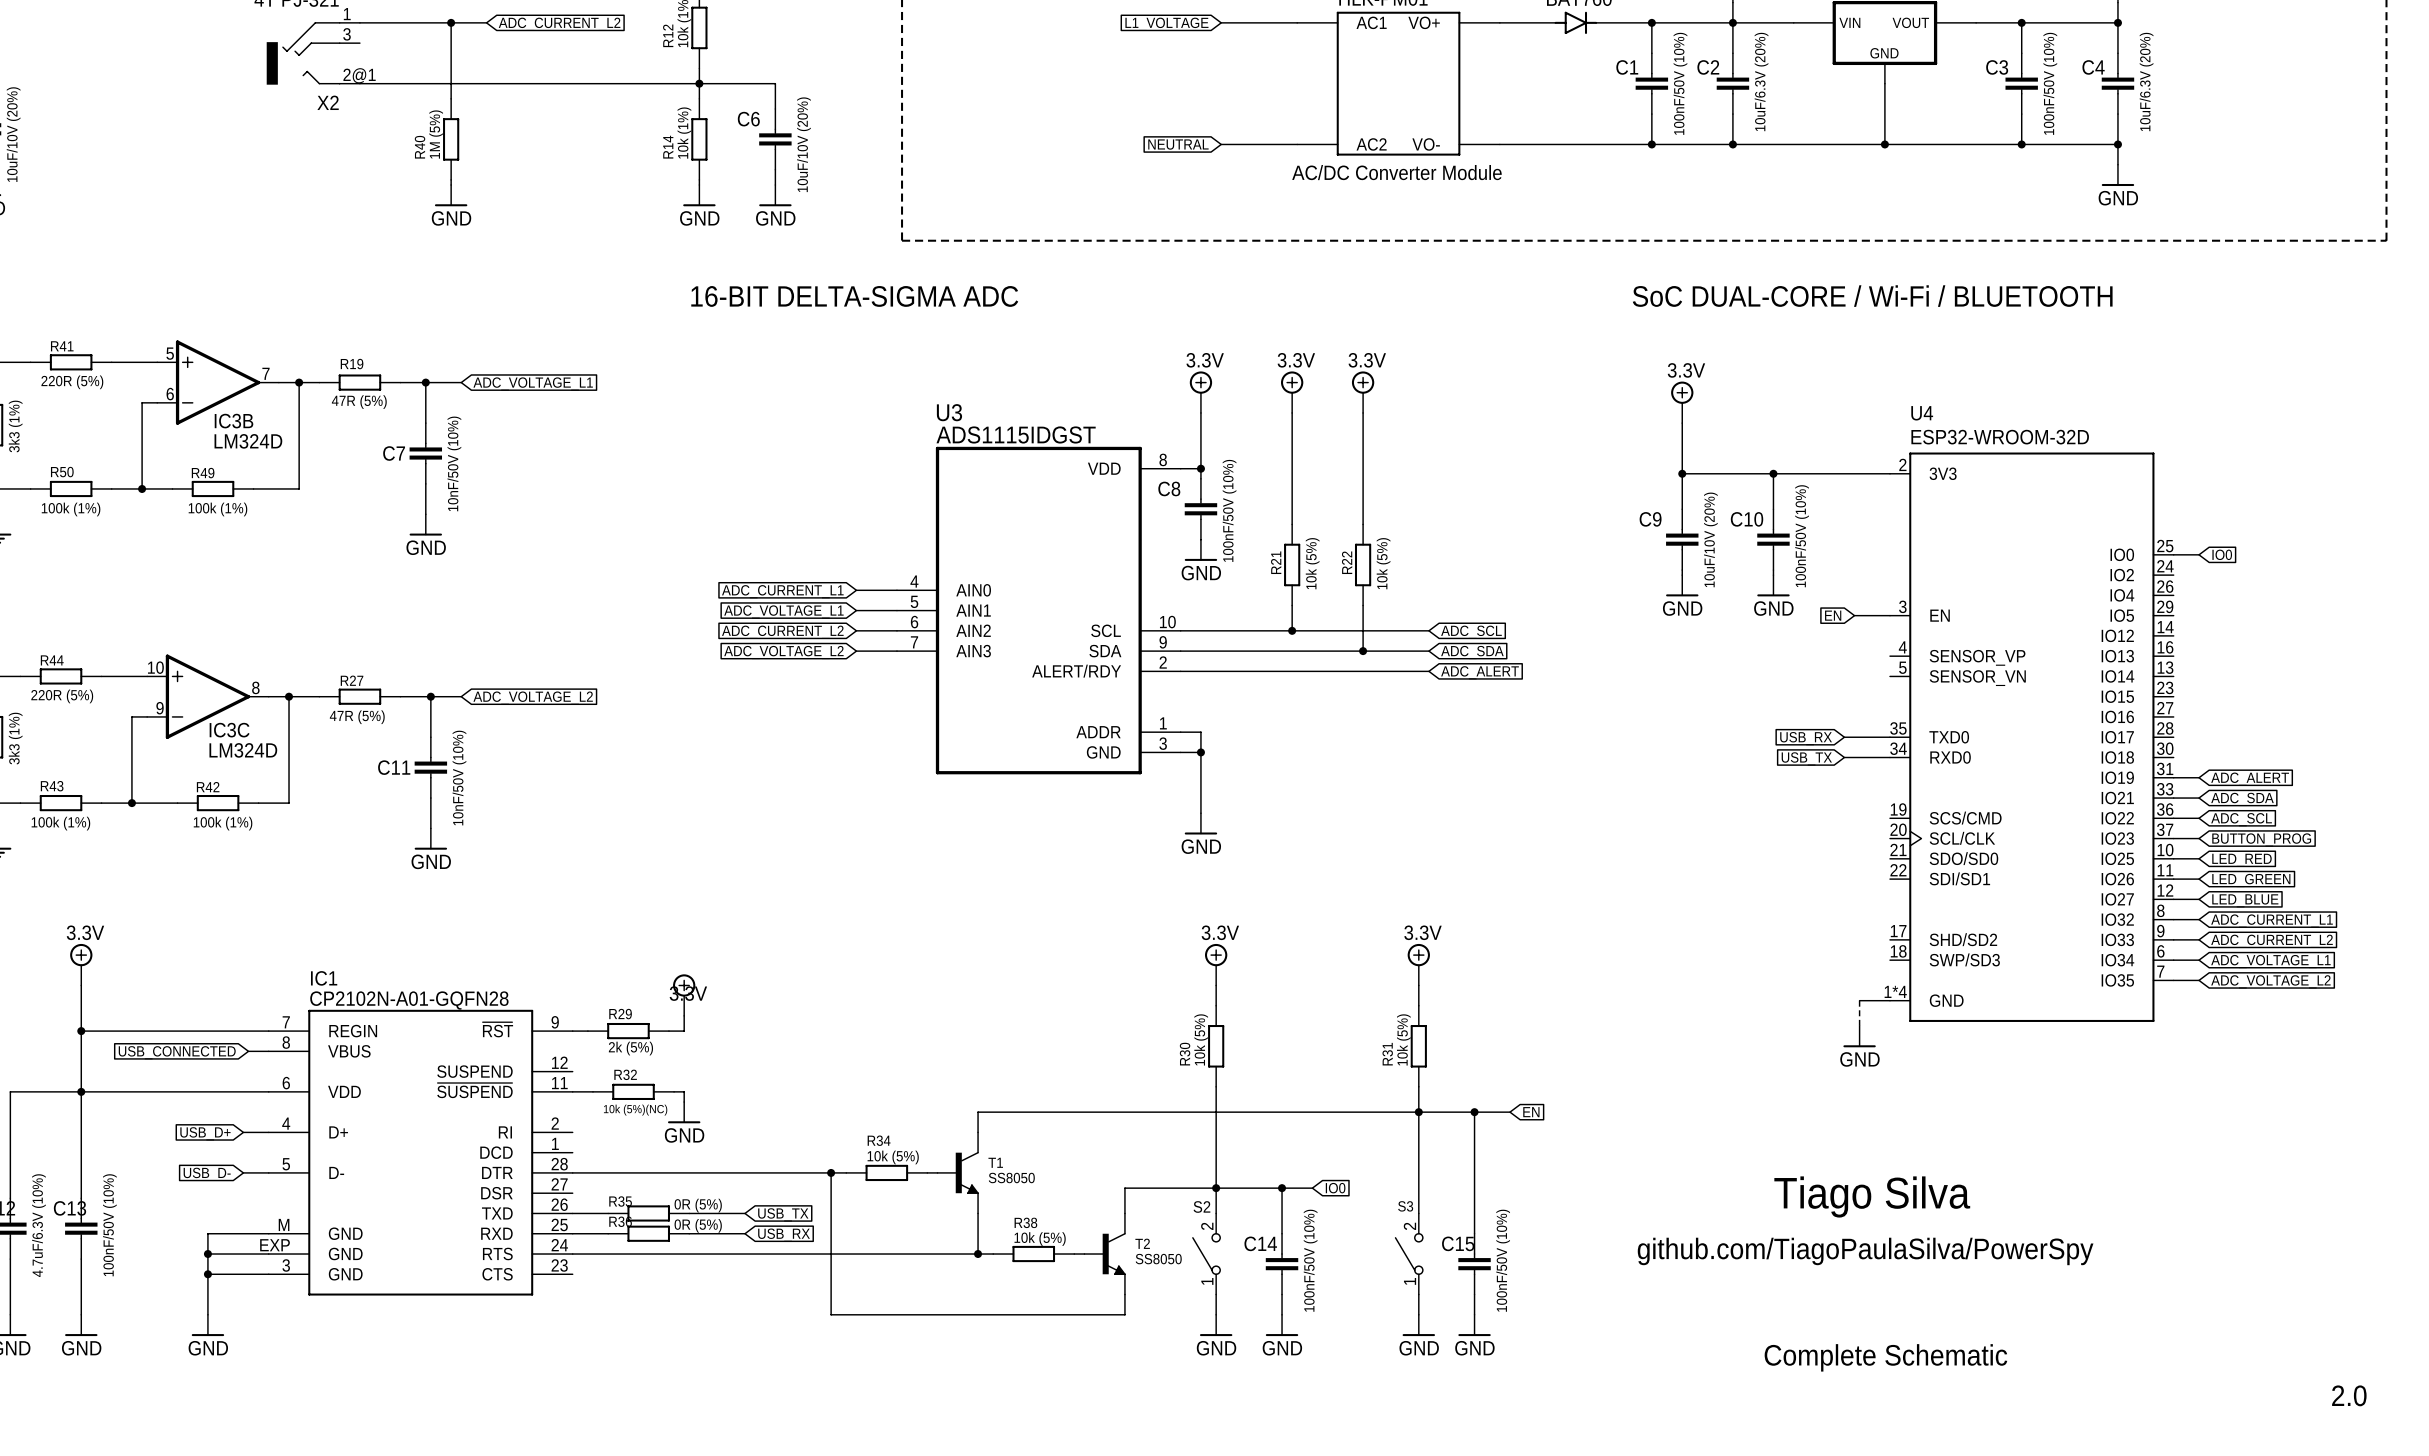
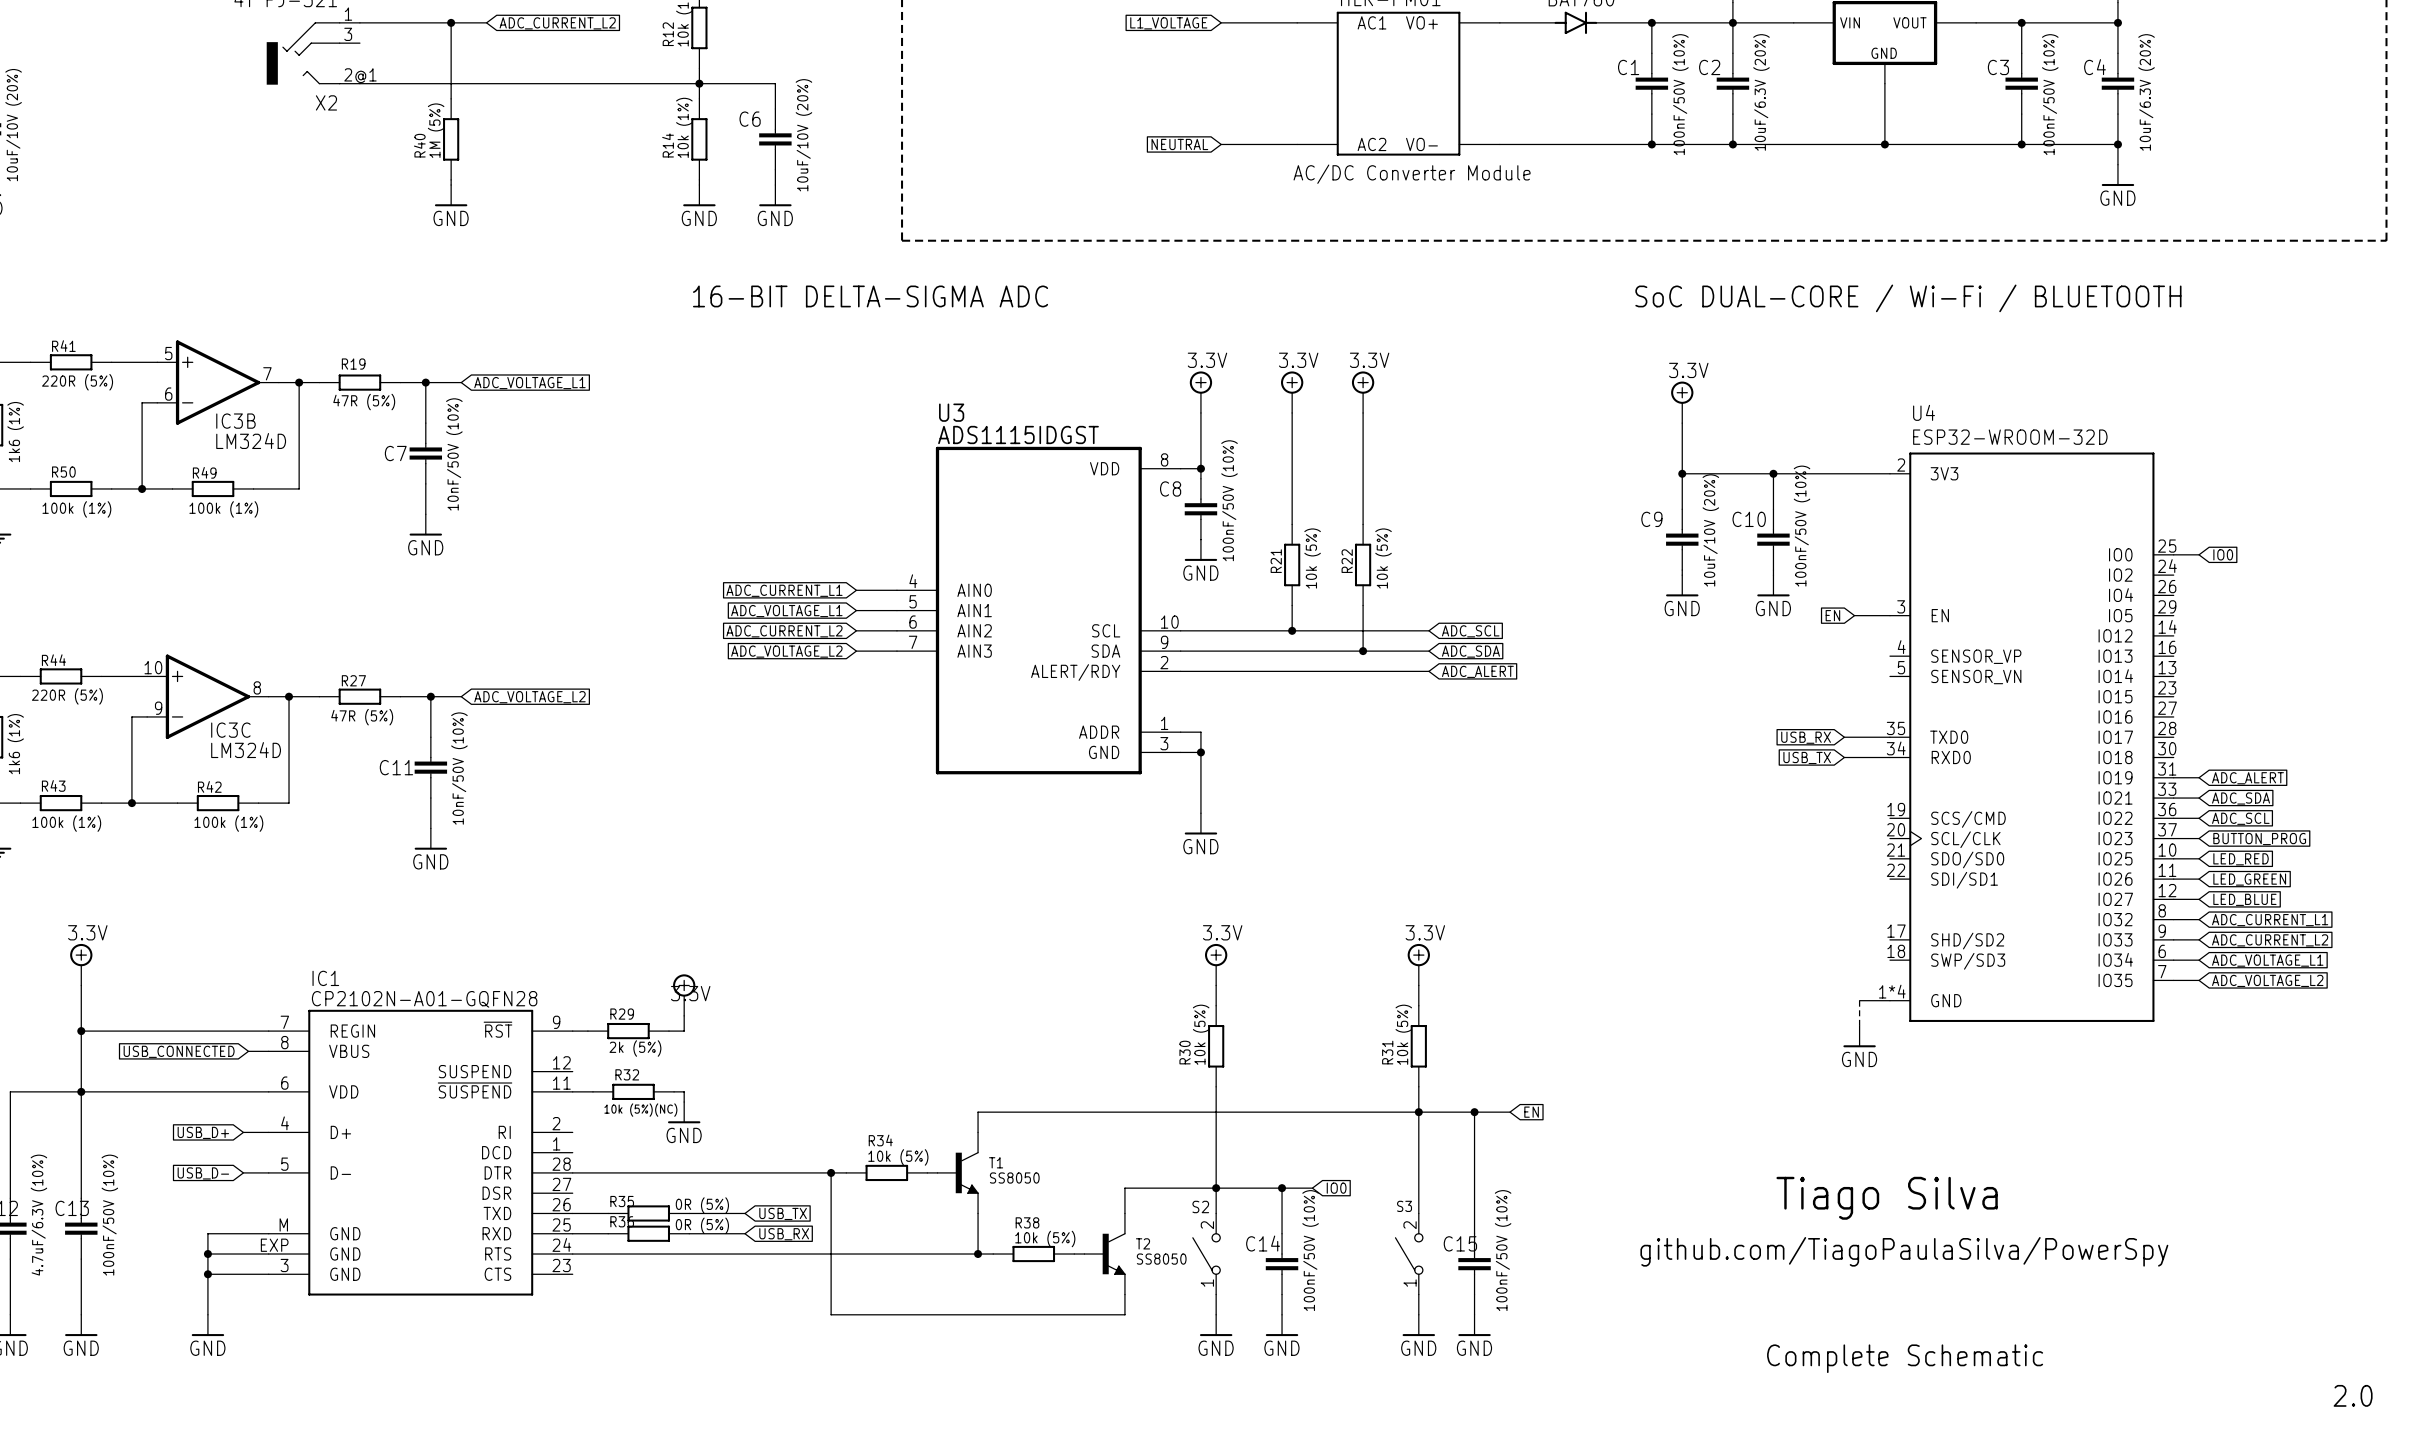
part value: 3k3 (1%) (15, 426) -> 1k6 (1%) (15, 432)
part value: 3k3 (1%) (15, 738) -> 1k6 (1%) (15, 744)

